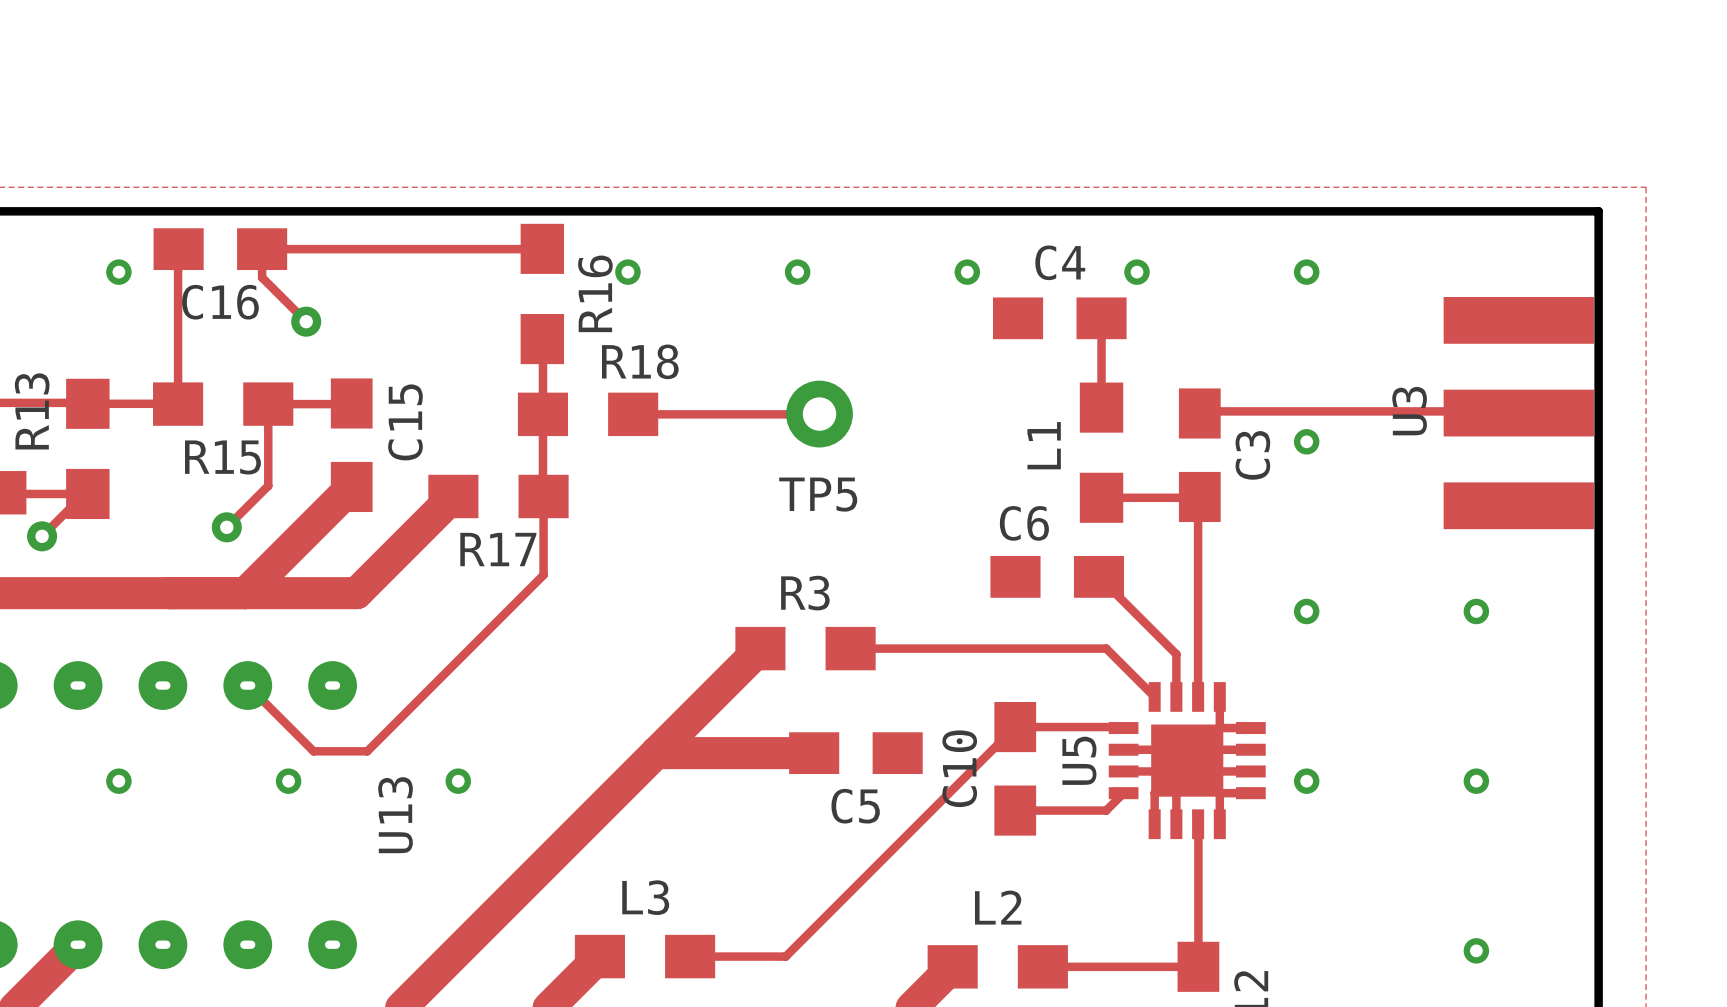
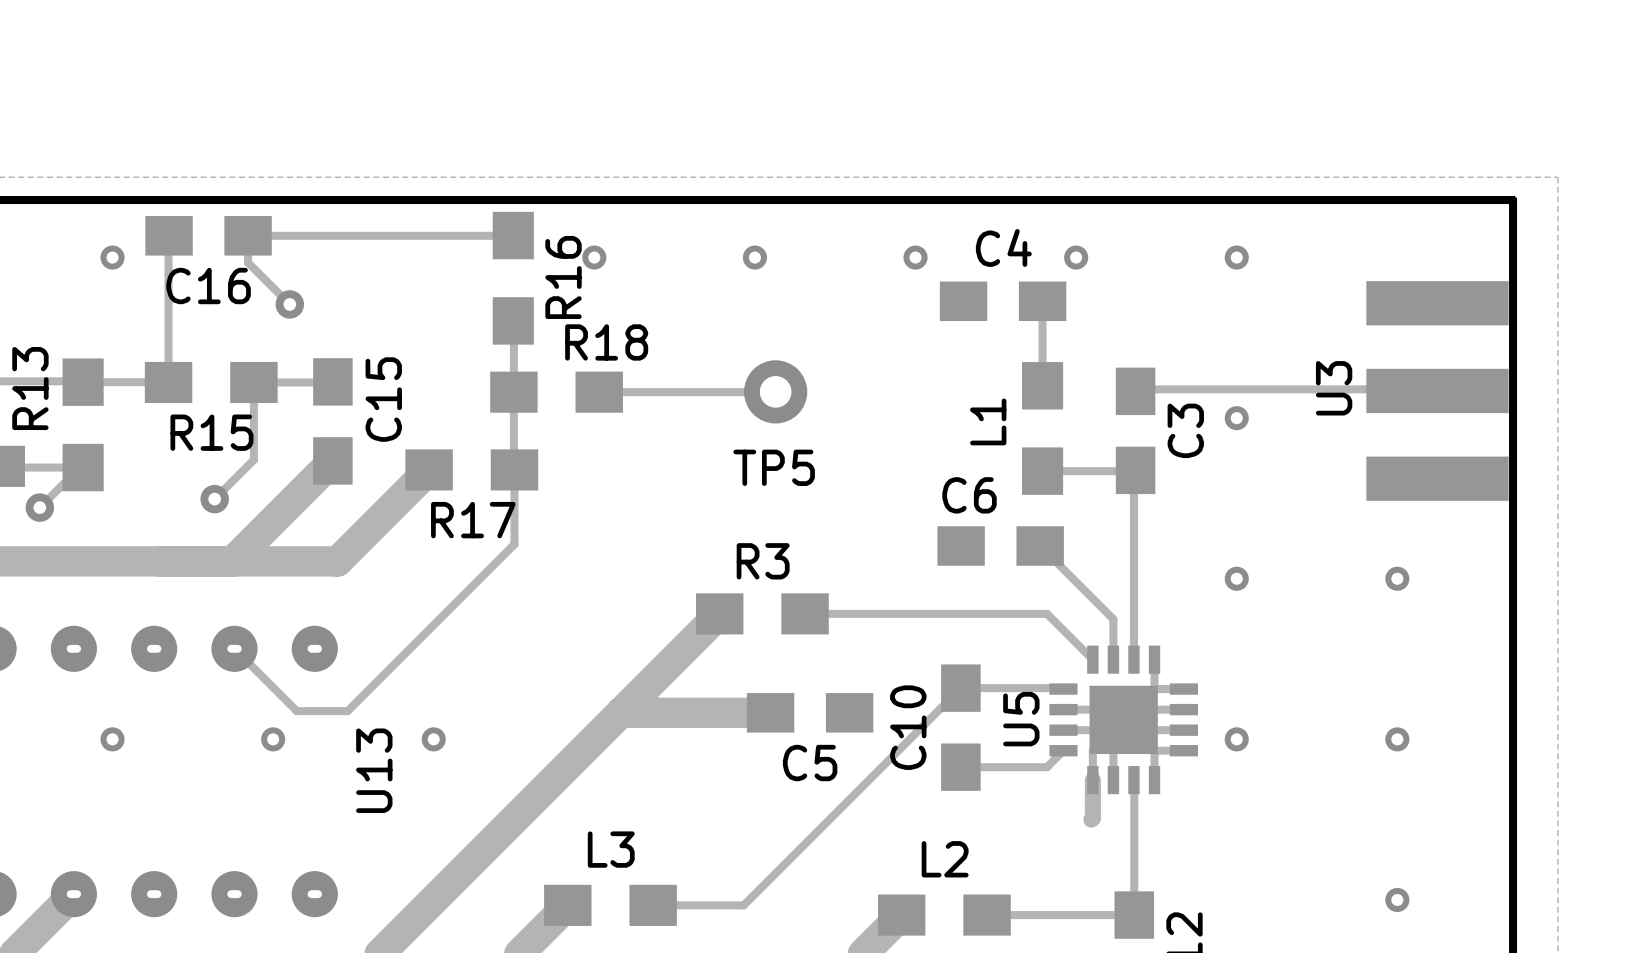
track: none -> (1092, 780) (1091, 819)

